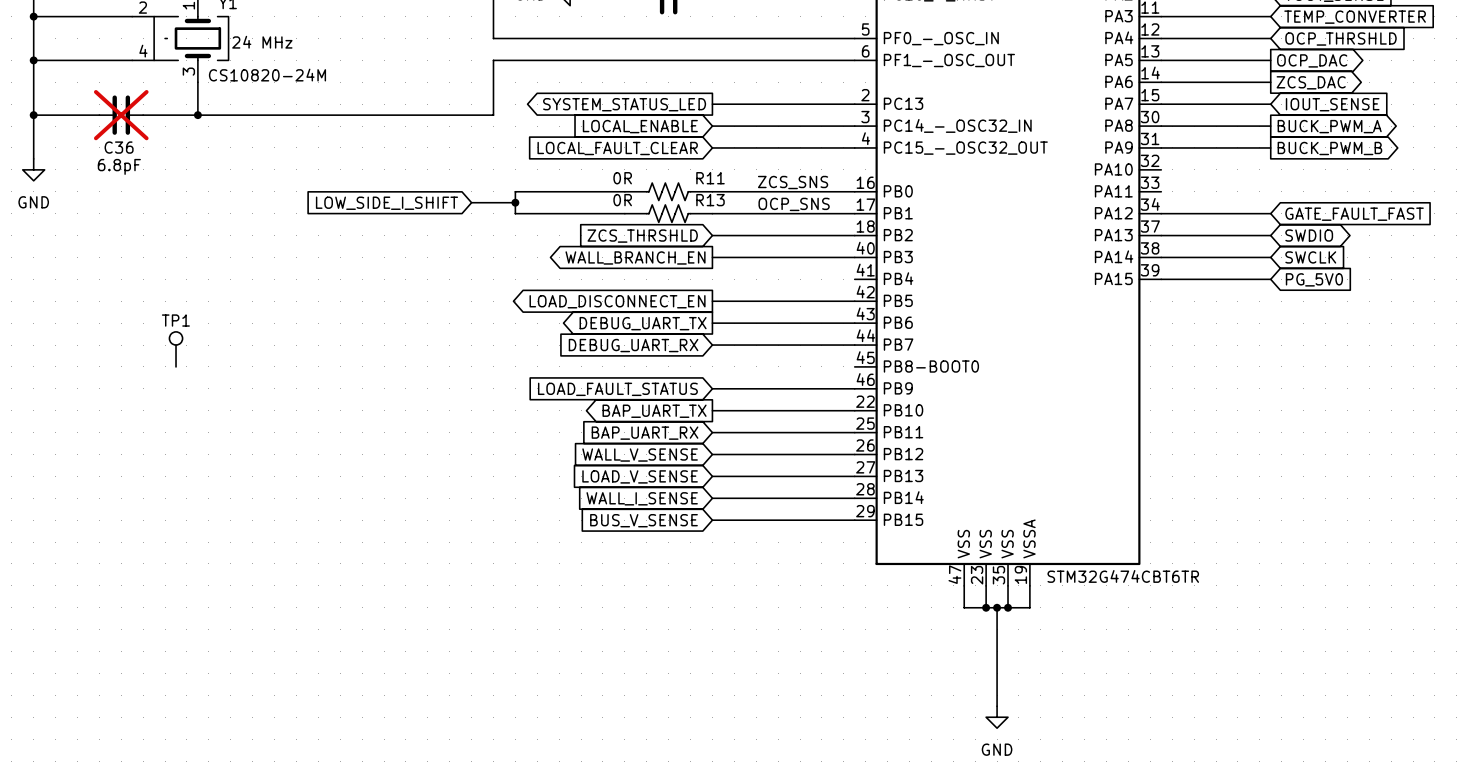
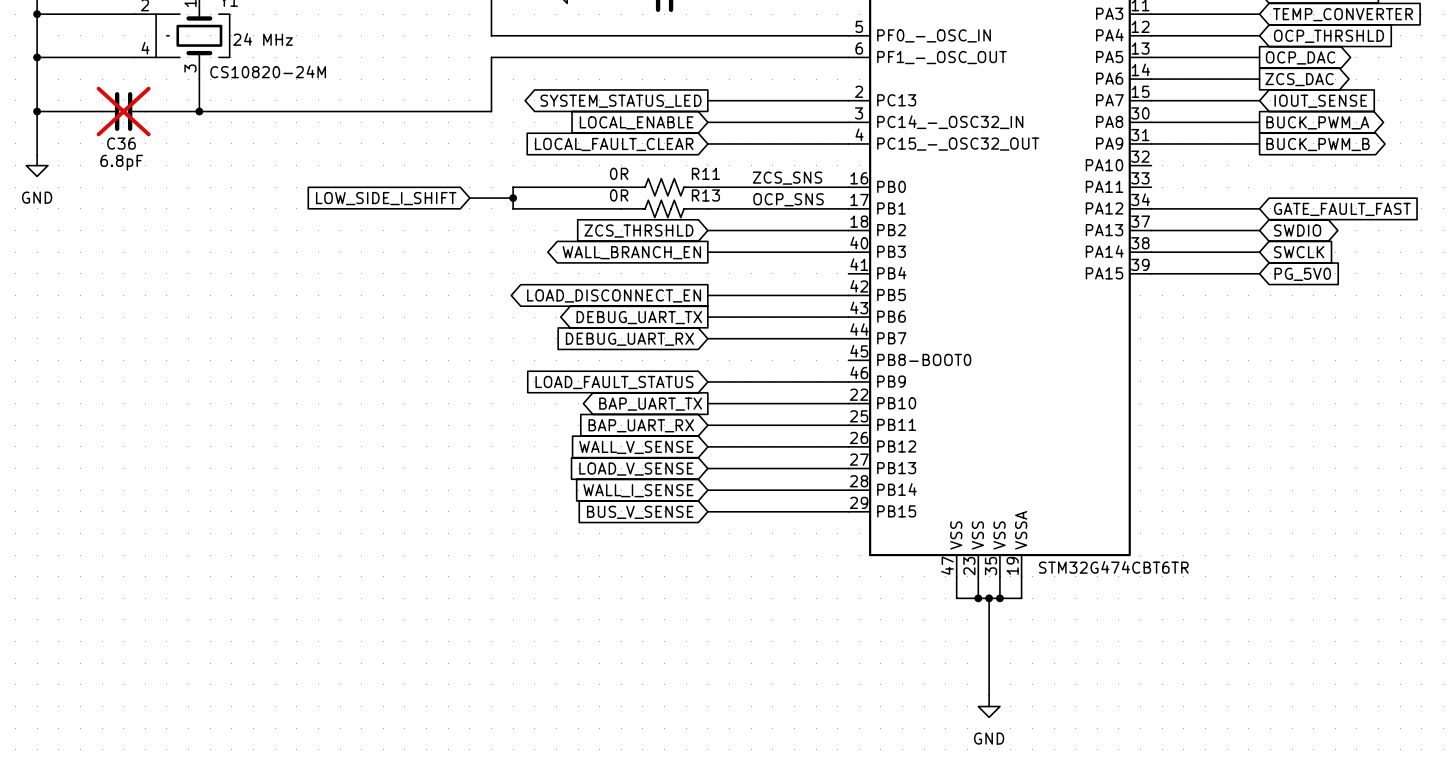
TP1: (176, 349) -> none

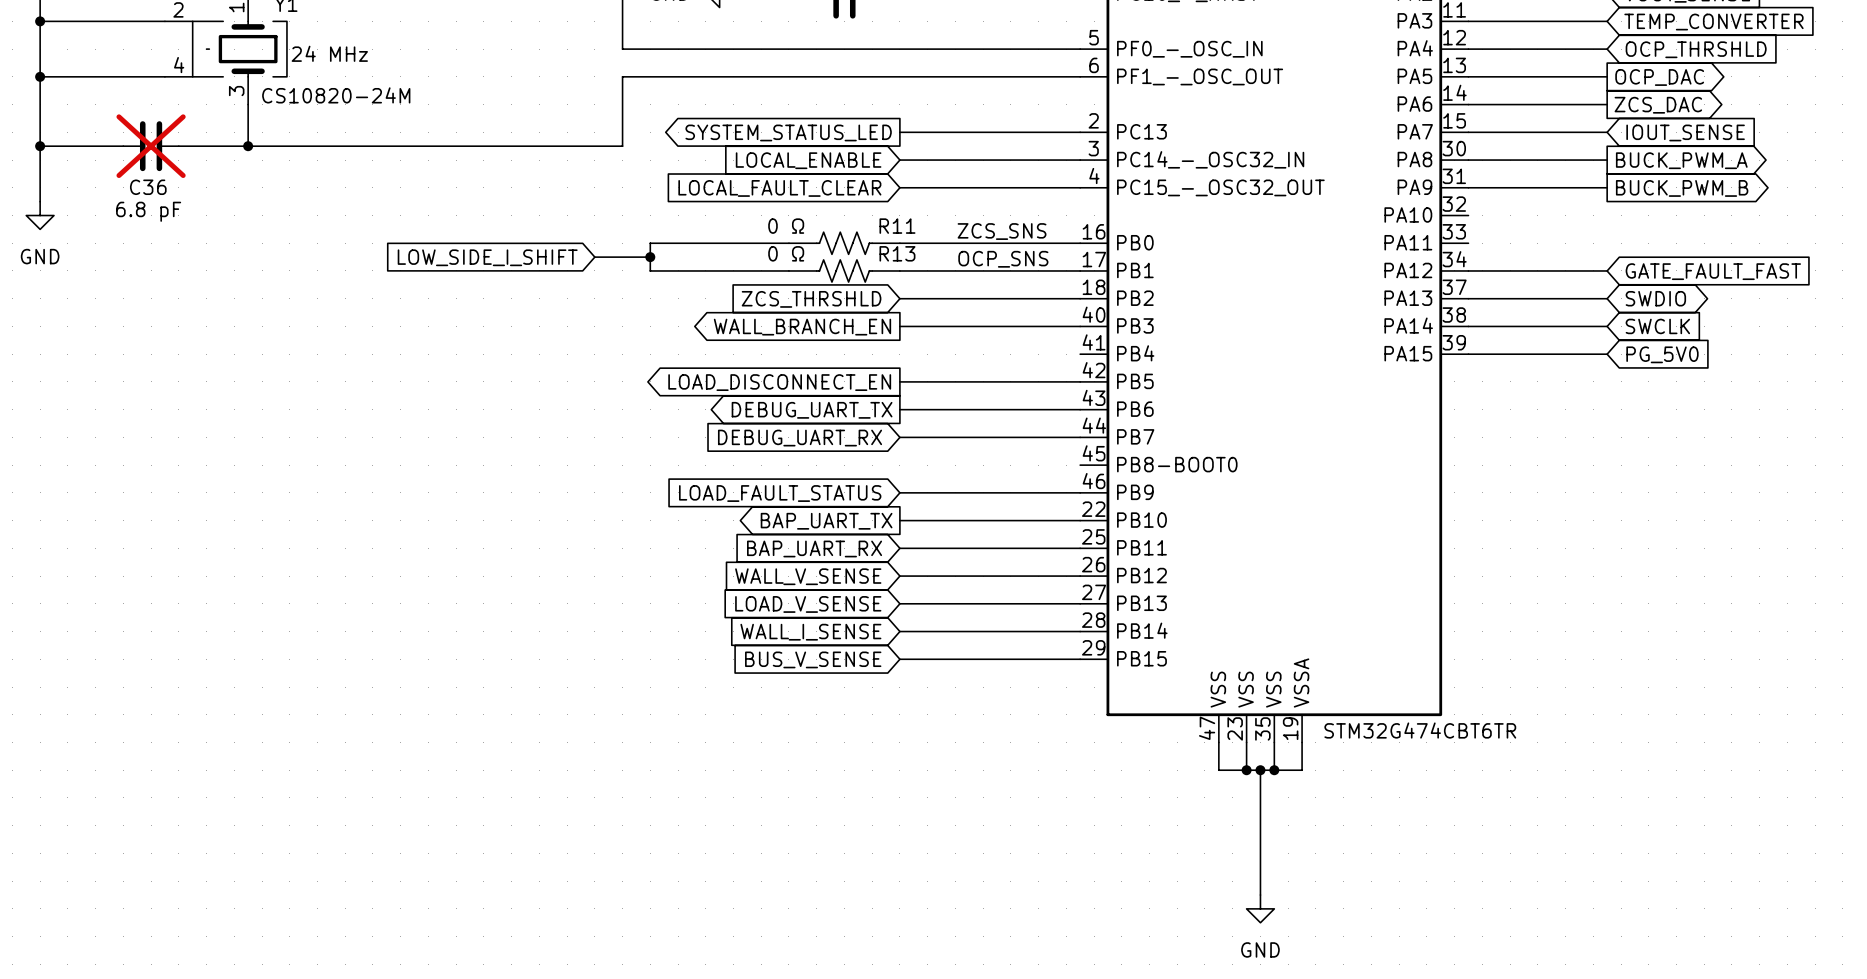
C36 value: 6.8pF (121, 162) -> 6.8 pF (148, 211)
R11 value: 0R (619, 173) -> 0 Ω (786, 226)
R13 value: 0R (619, 195) -> 0 Ω (786, 253)

